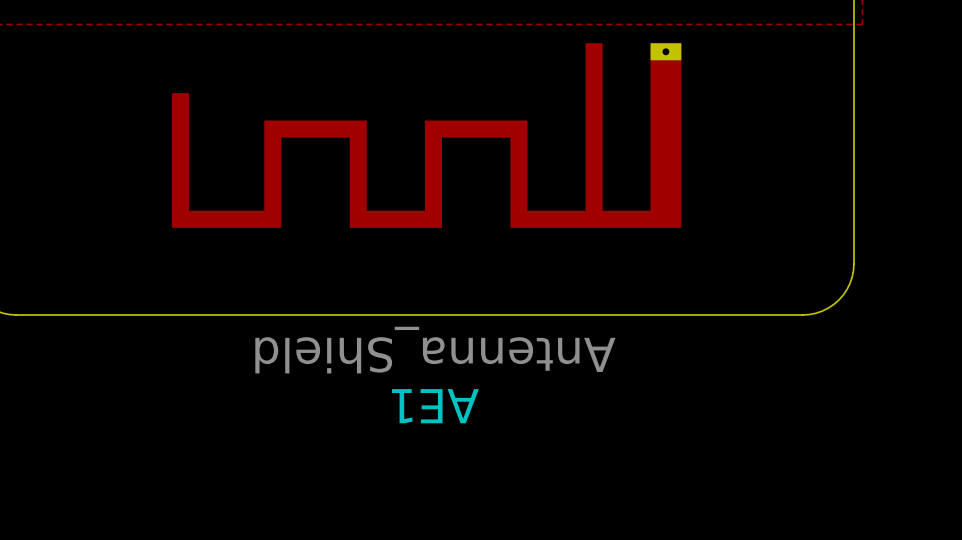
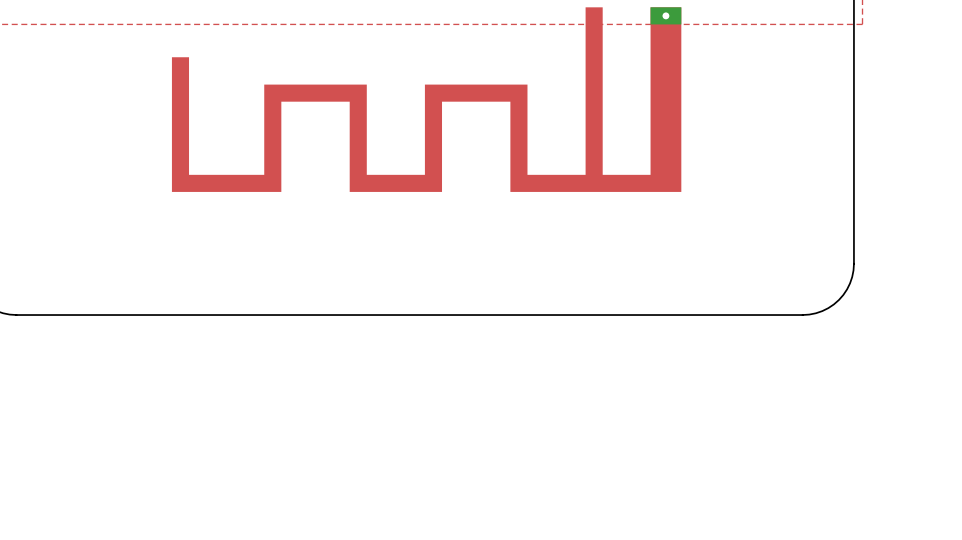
part: none -> (426, 99)
AE1: Antenna_Shield (426, 135) -> none

